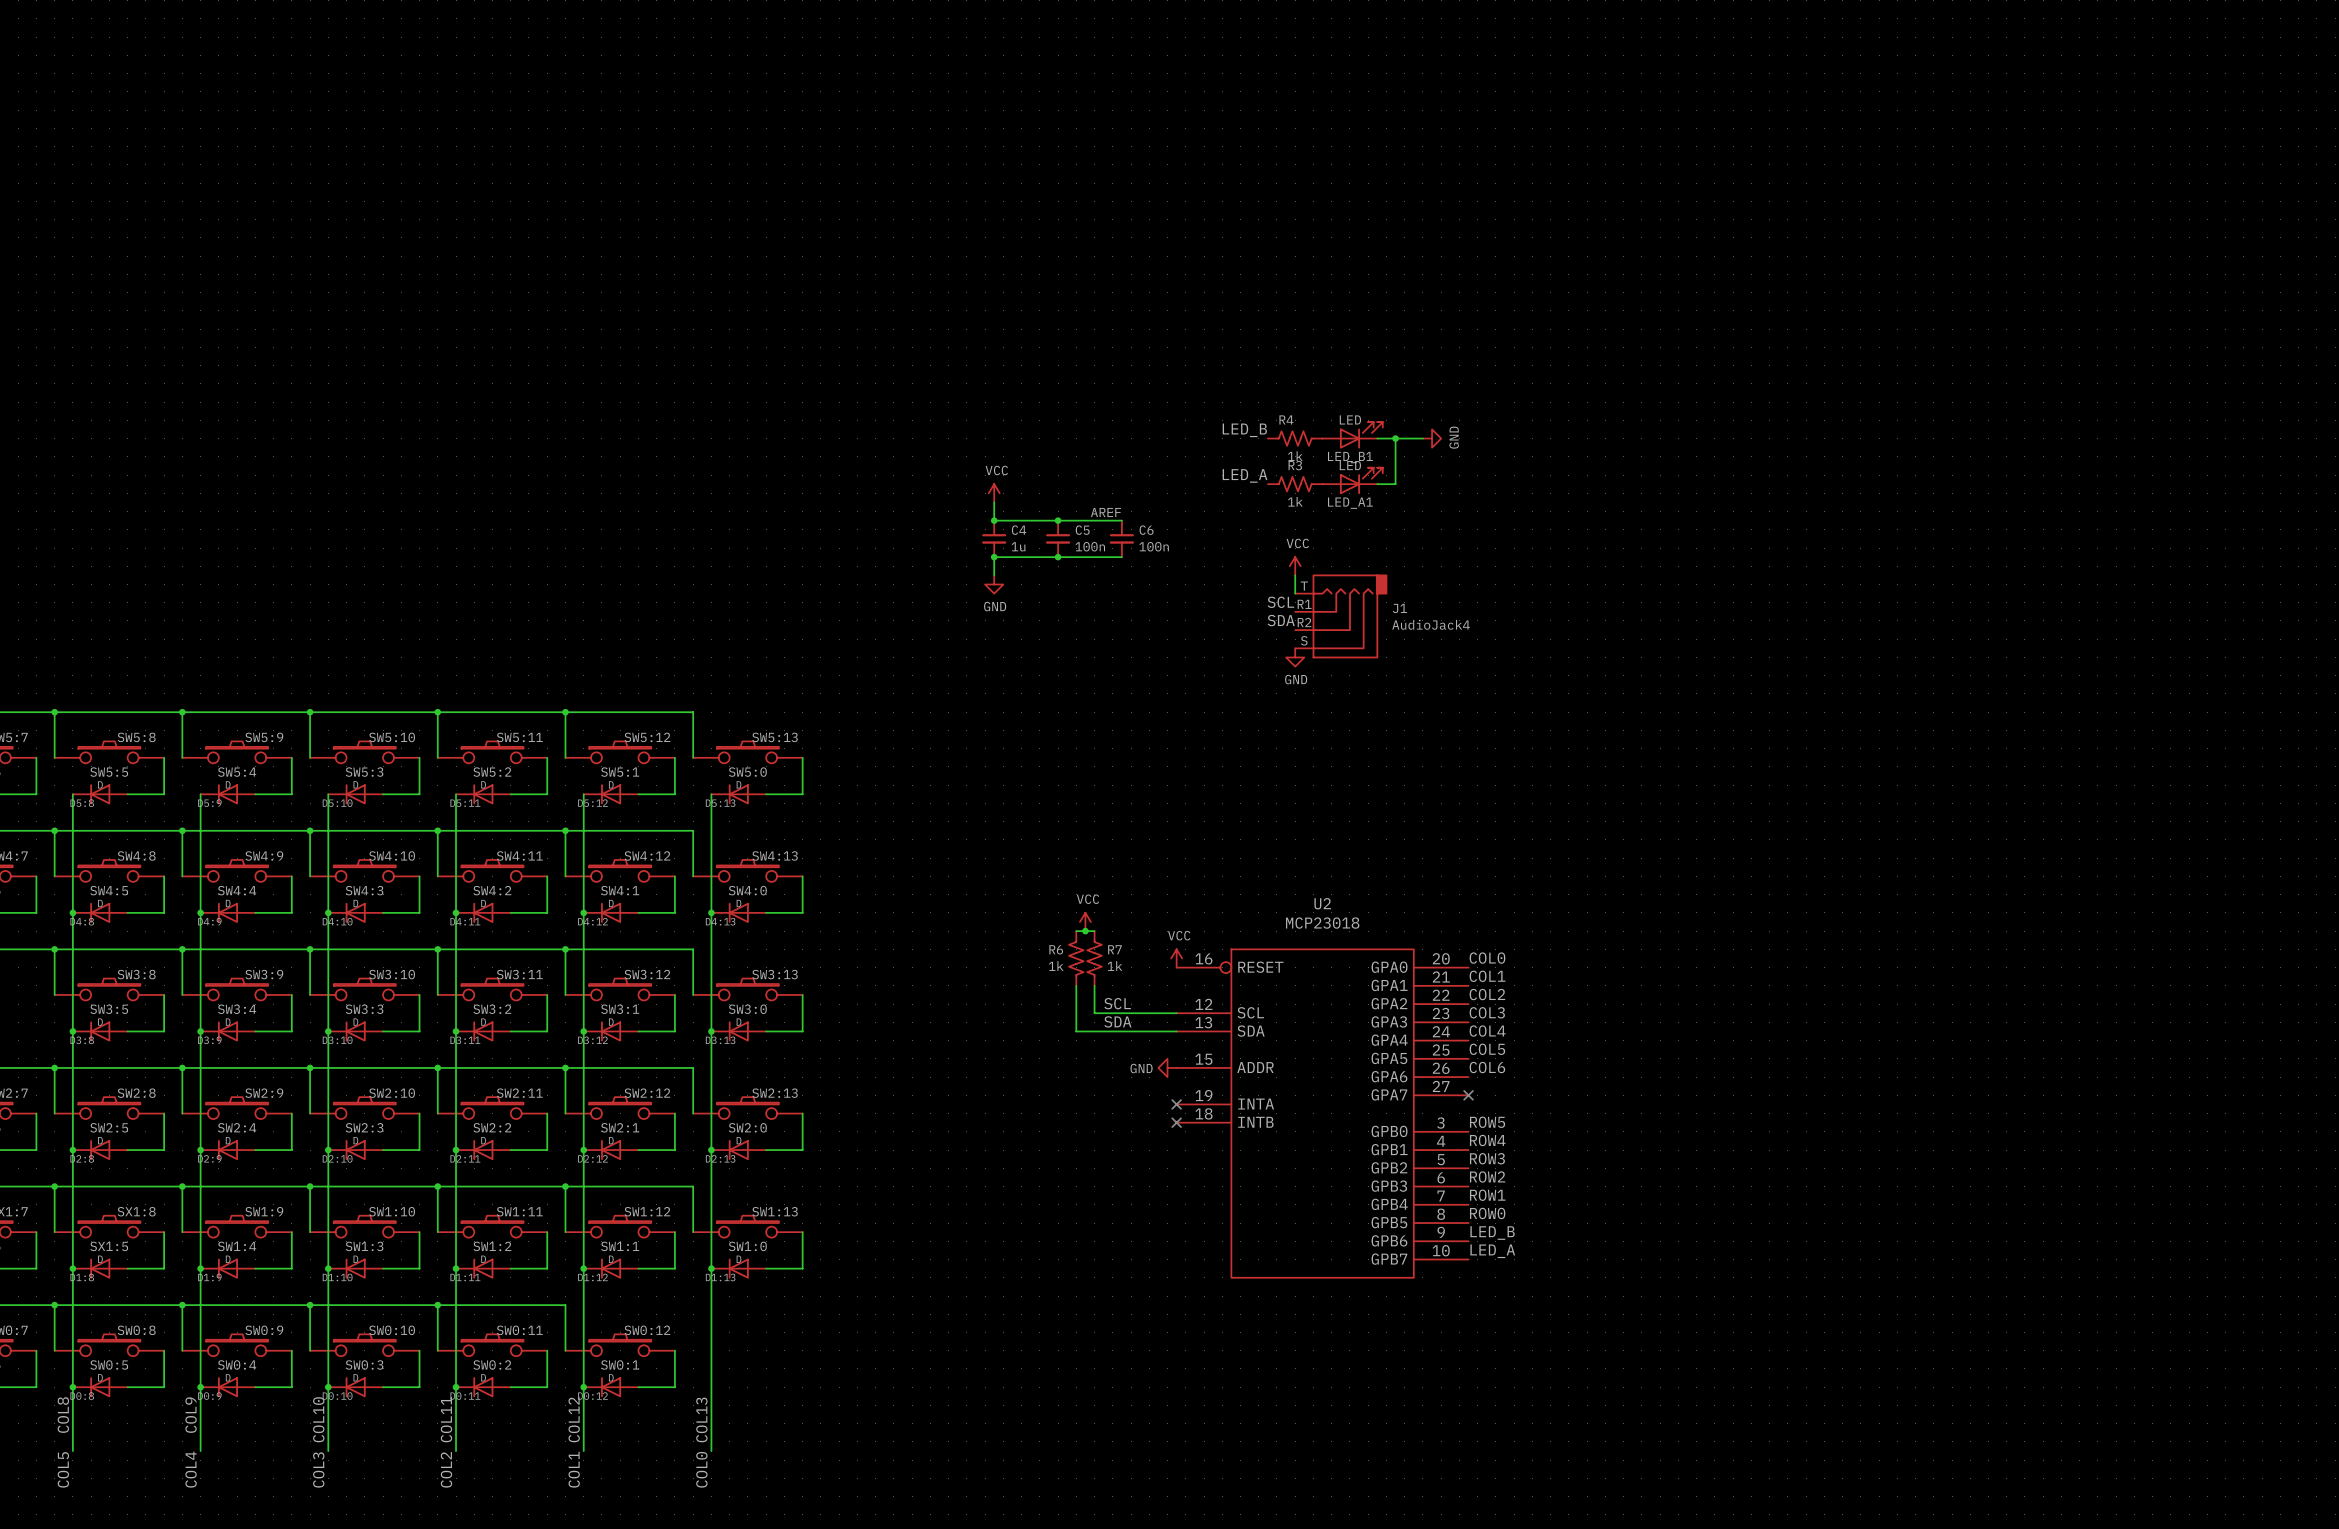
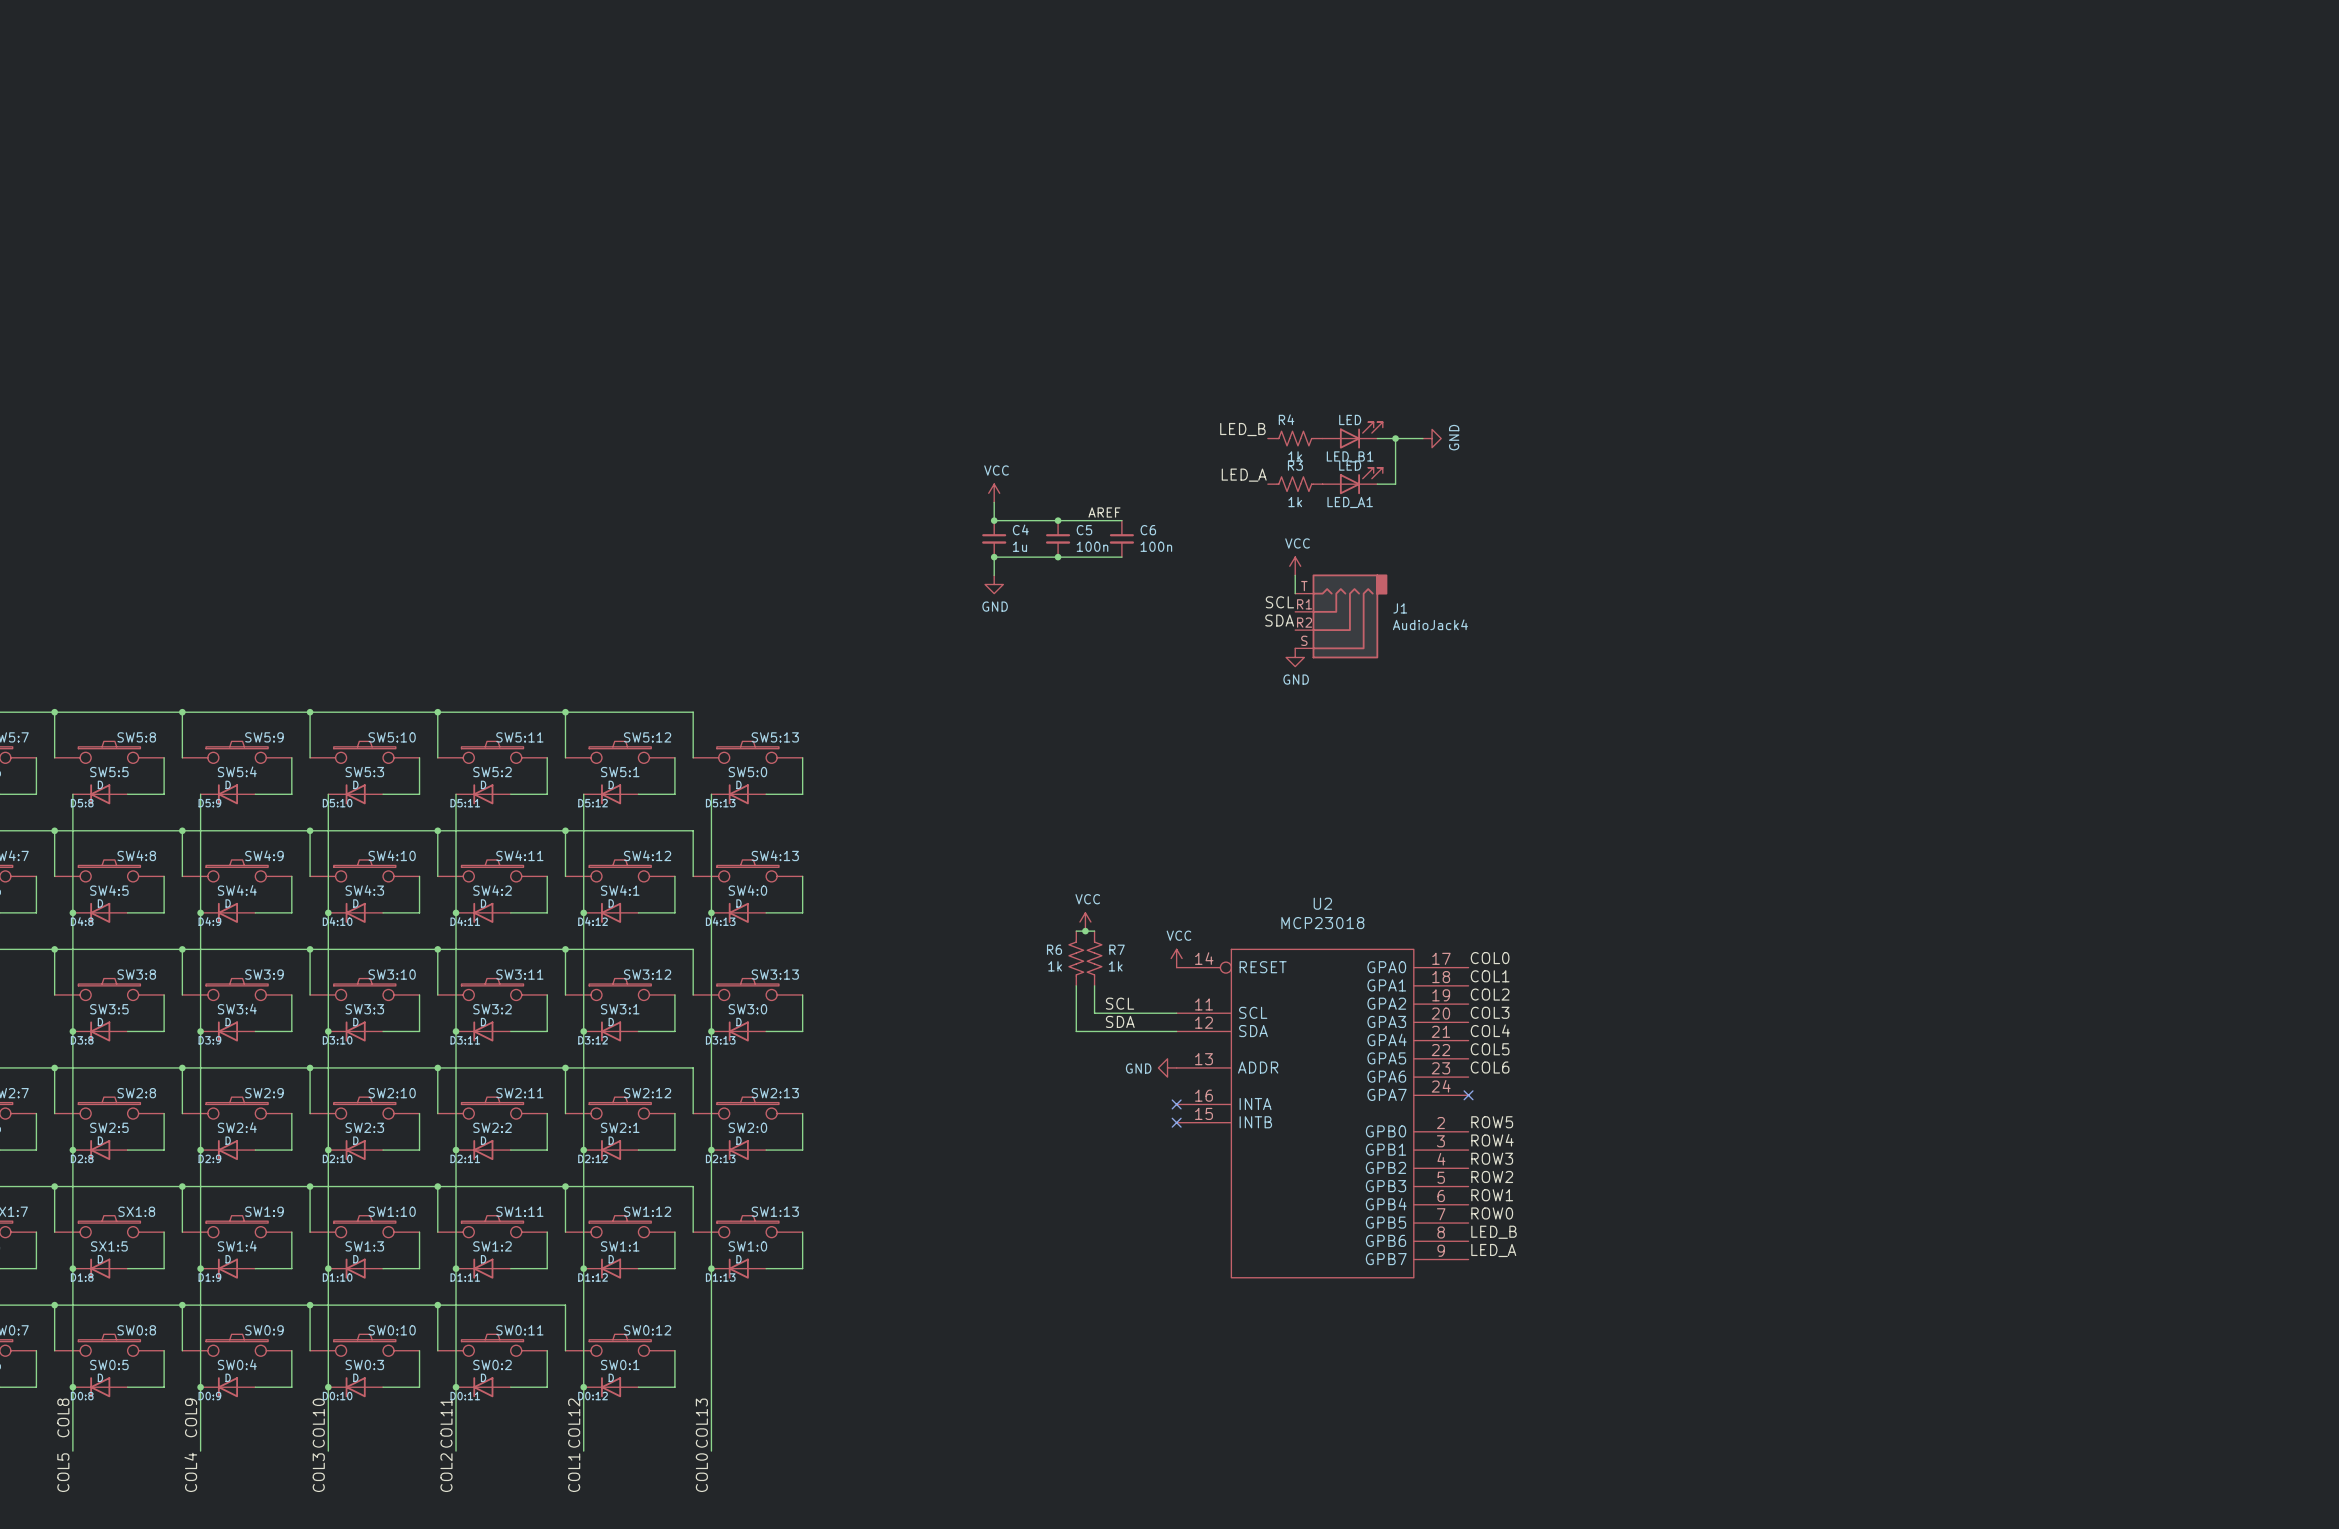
U2 symbol: [1176, 949, 1469, 1278] -> [1176, 949, 1469, 1278]

